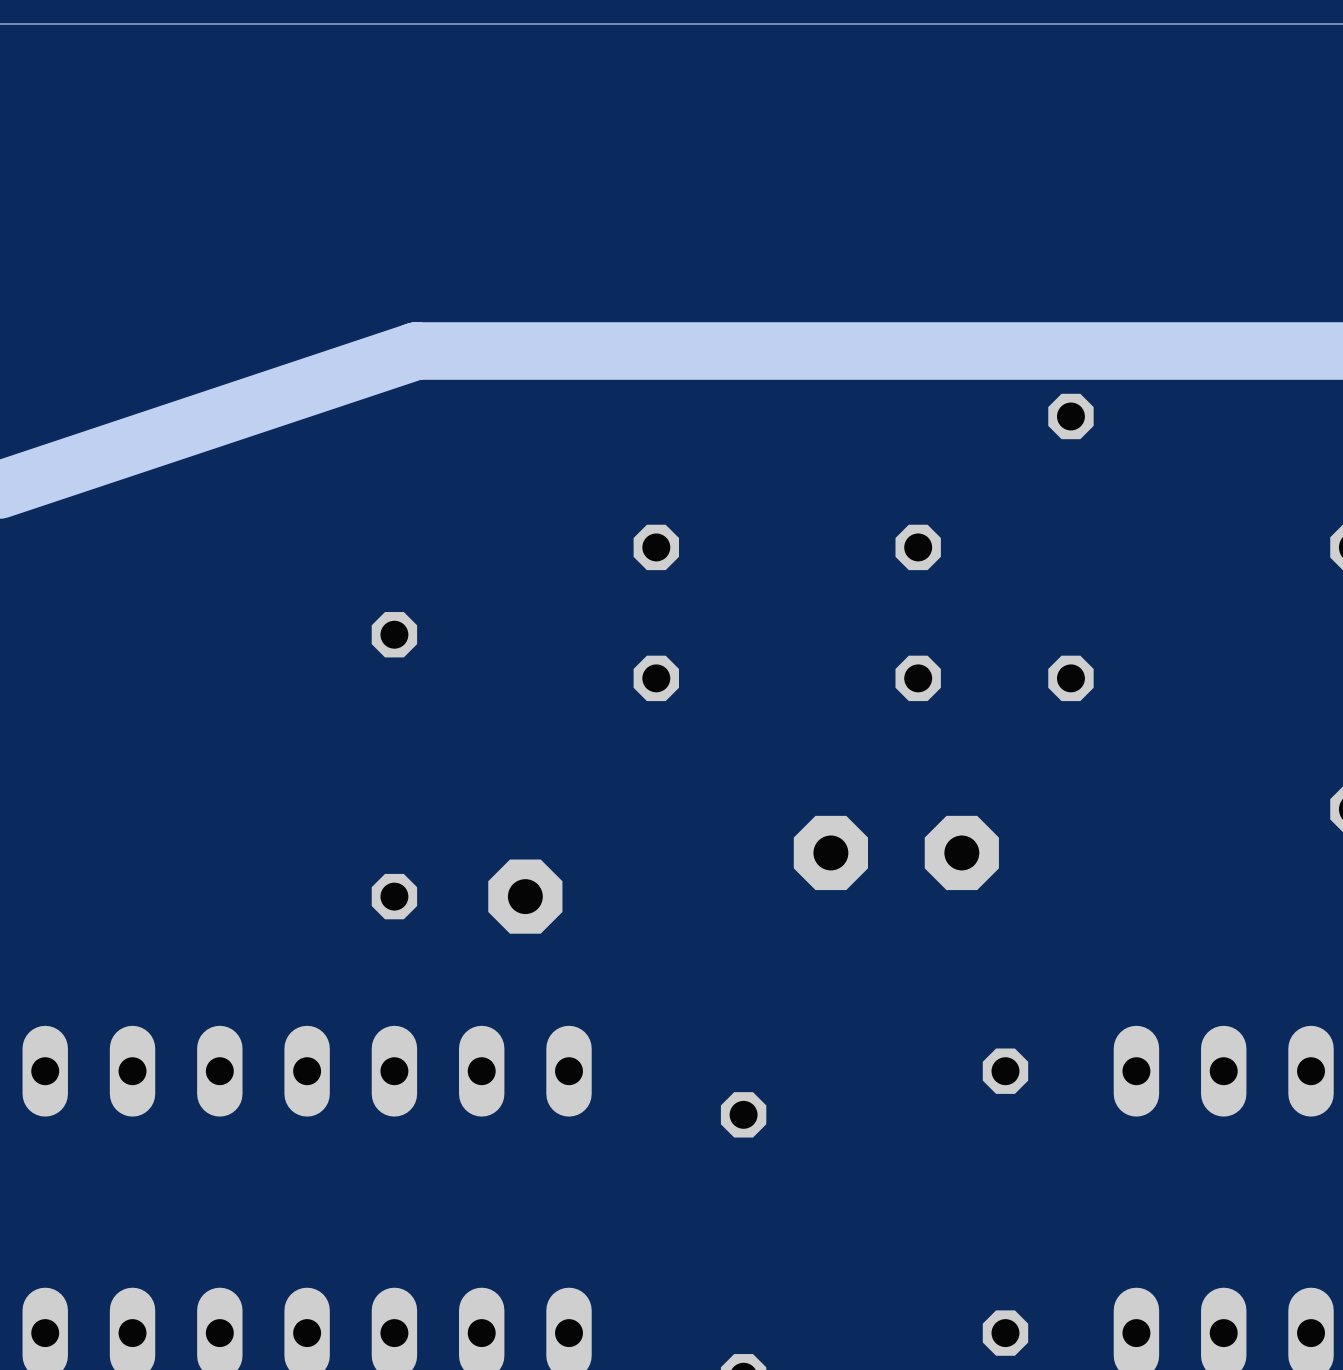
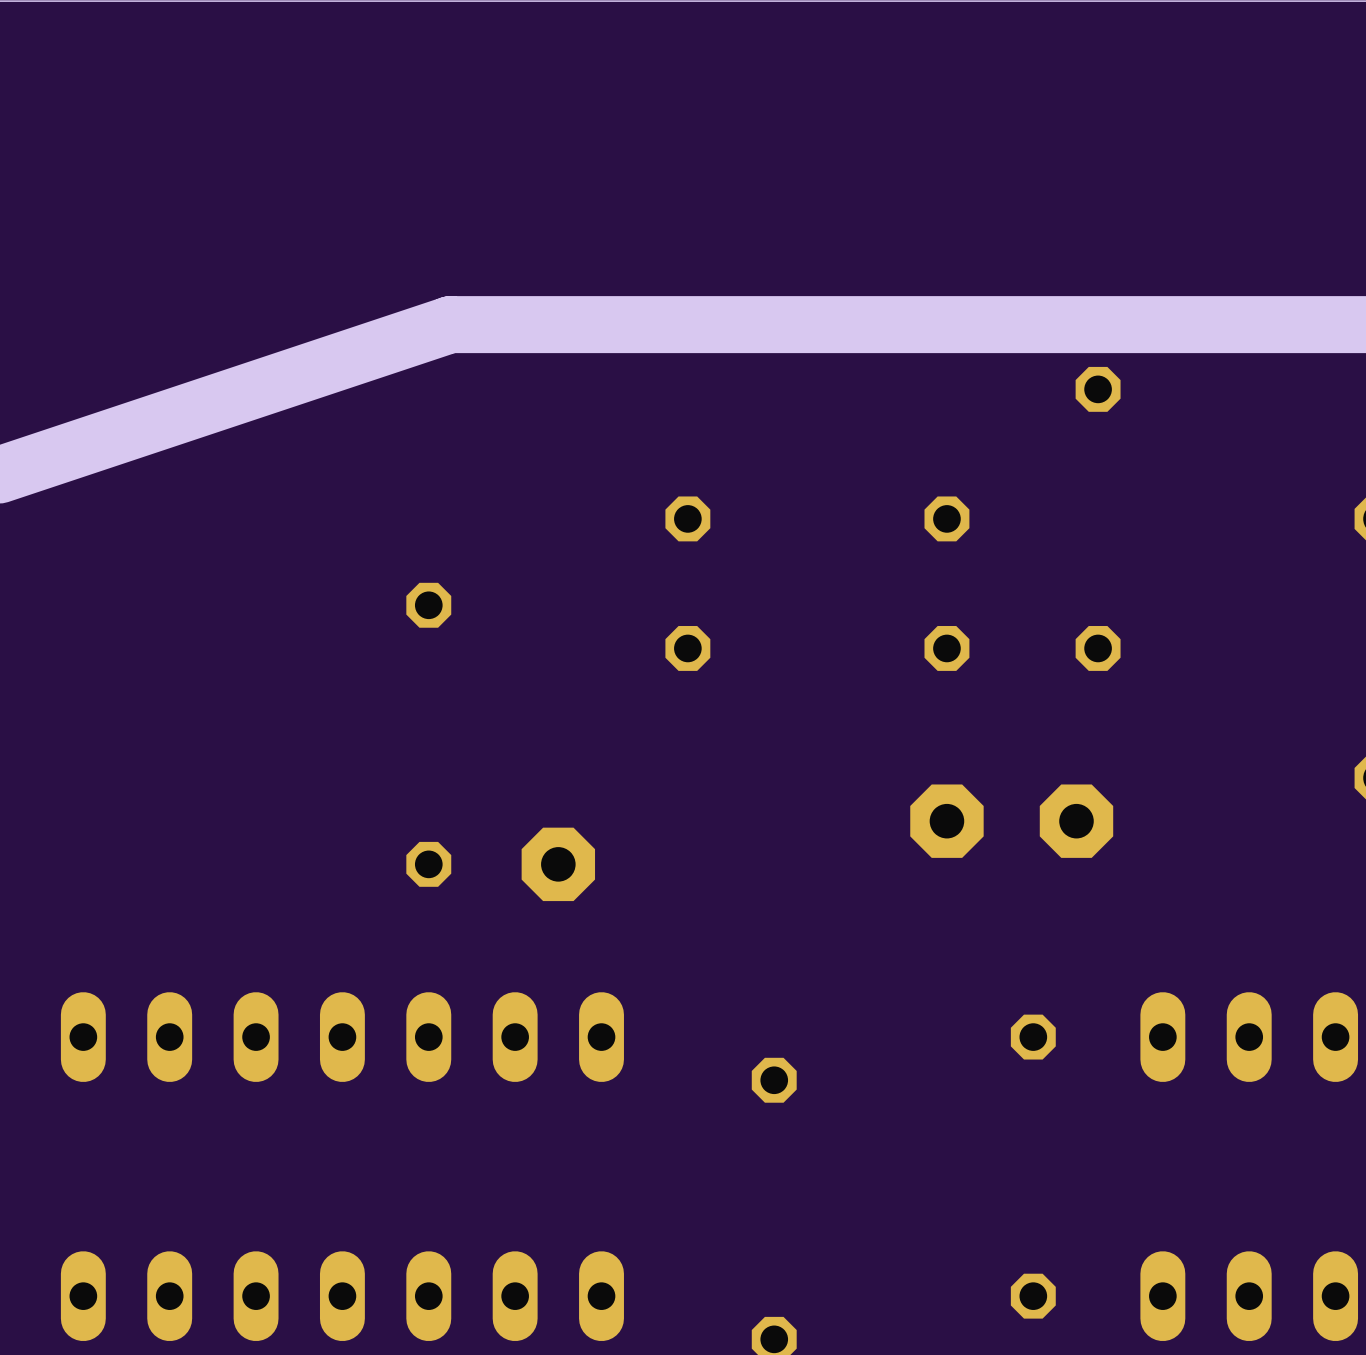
part: (830, 852) -> none
part: none -> (946, 821)
part: (961, 852) -> none
part: none -> (1076, 821)

